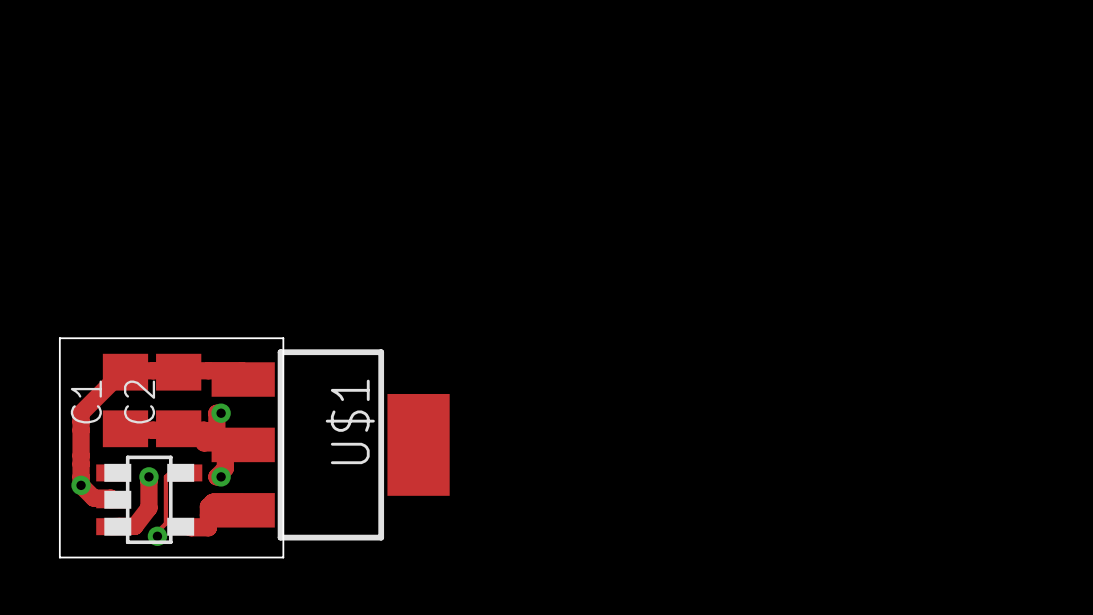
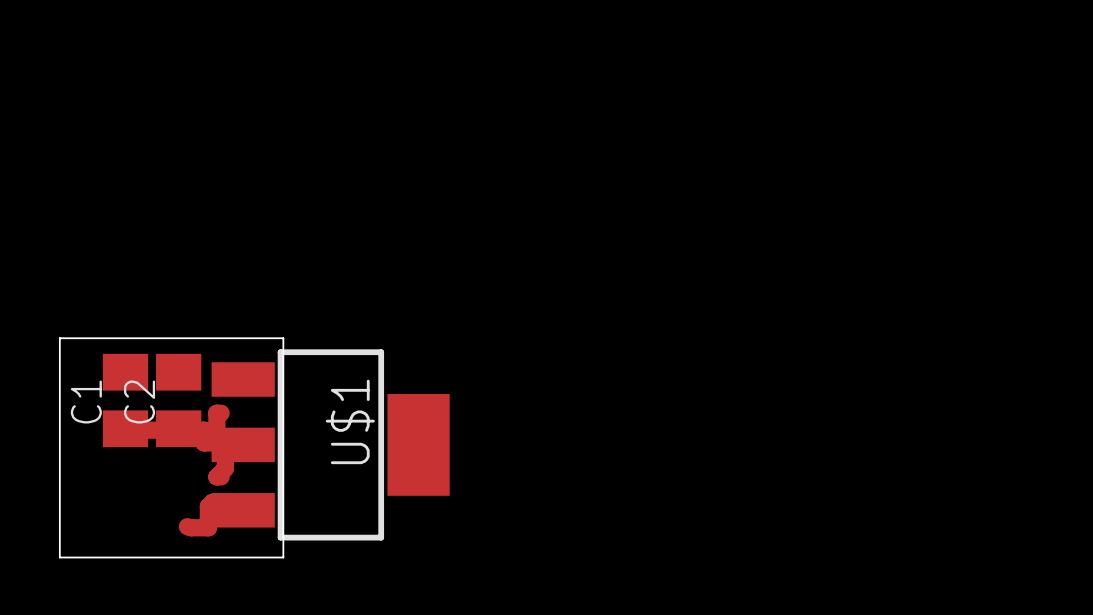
track: (243, 379) (242, 370) (127, 370) (119, 375) (81, 413) (81, 485) (93, 498) (110, 498) (111, 499) -> none
via: (221, 413) -> none
track: (187, 472) (170, 472) (165, 476) (165, 523) (157, 532) (157, 536) -> none
track: (148, 476) (148, 508) (134, 526) (111, 526) -> none
via: (148, 476) -> none
via: (221, 476) -> none
via: (81, 485) -> none
part: (149, 499) -> none
via: (157, 536) -> none

